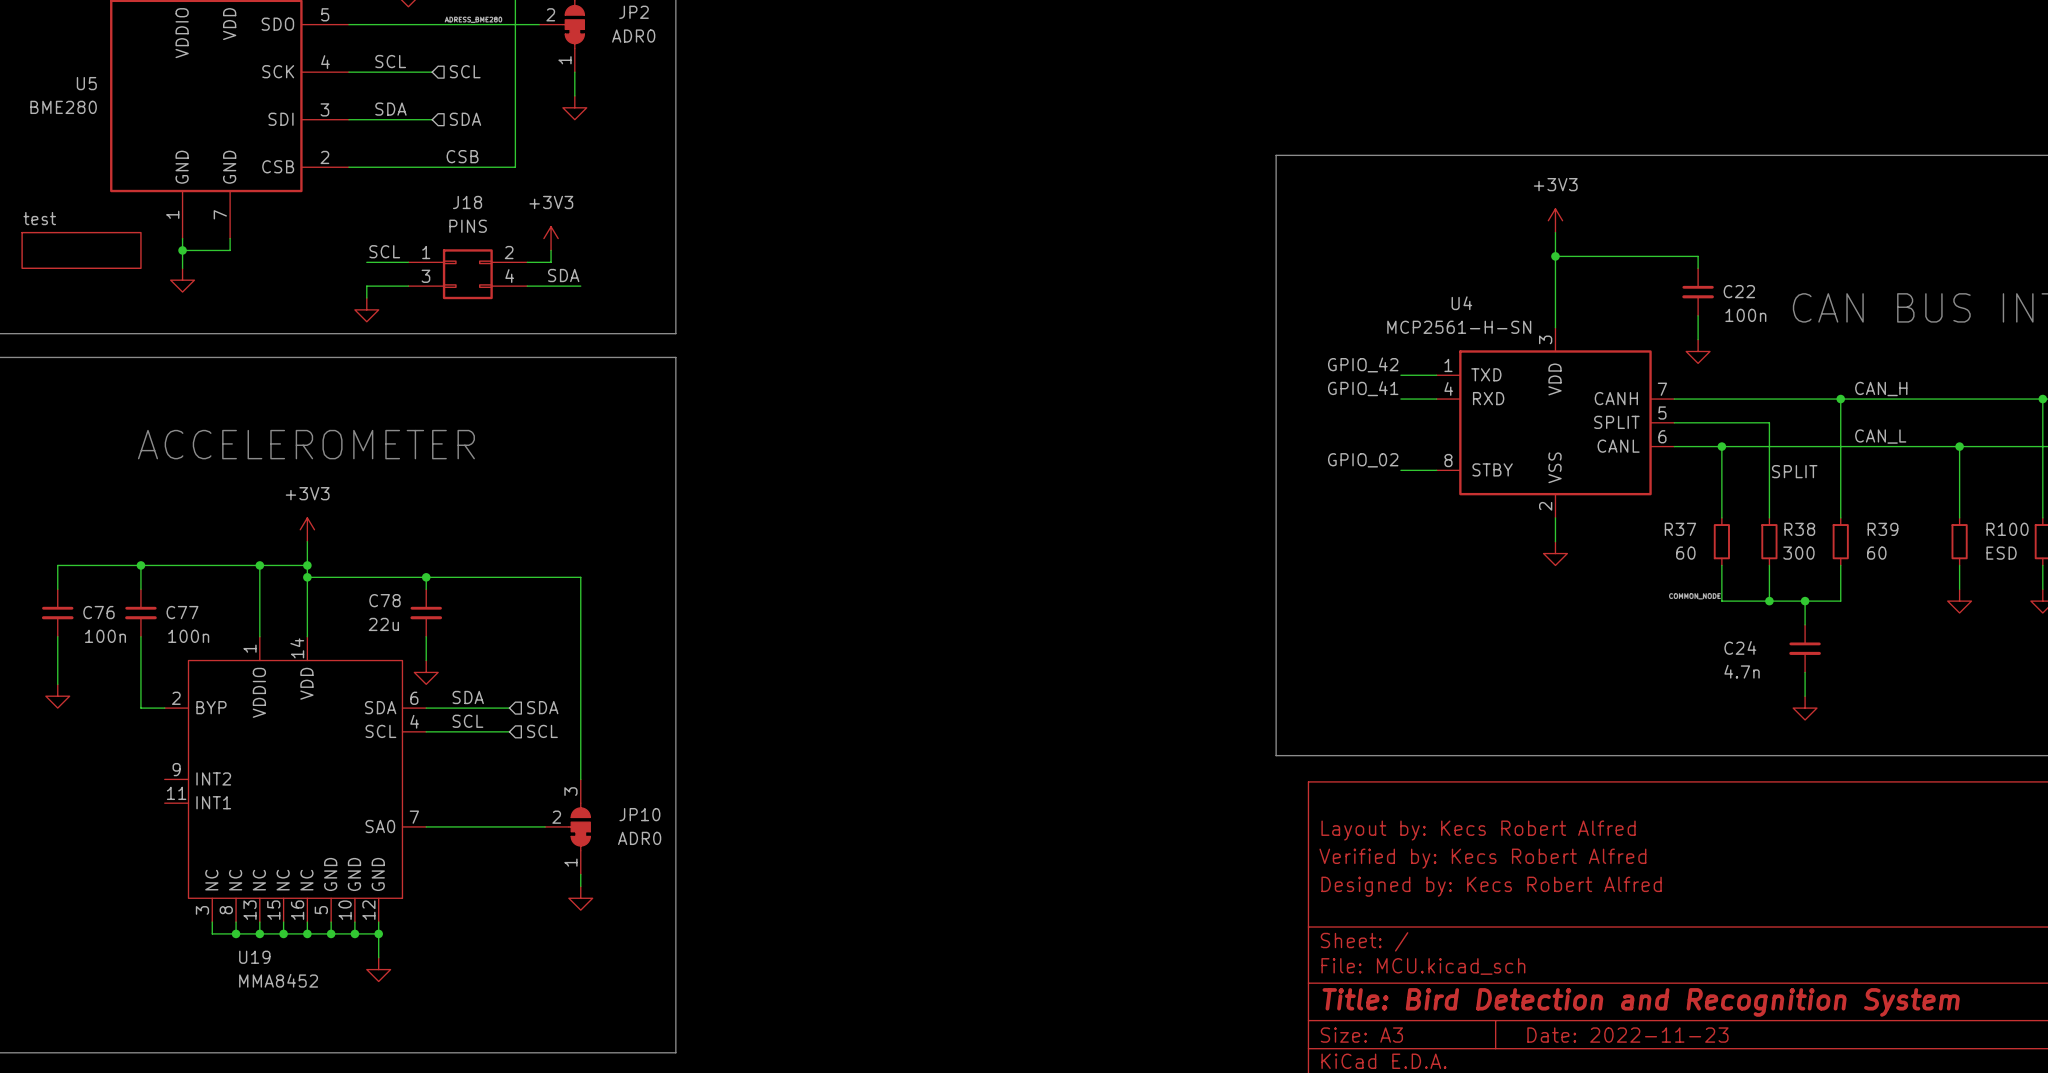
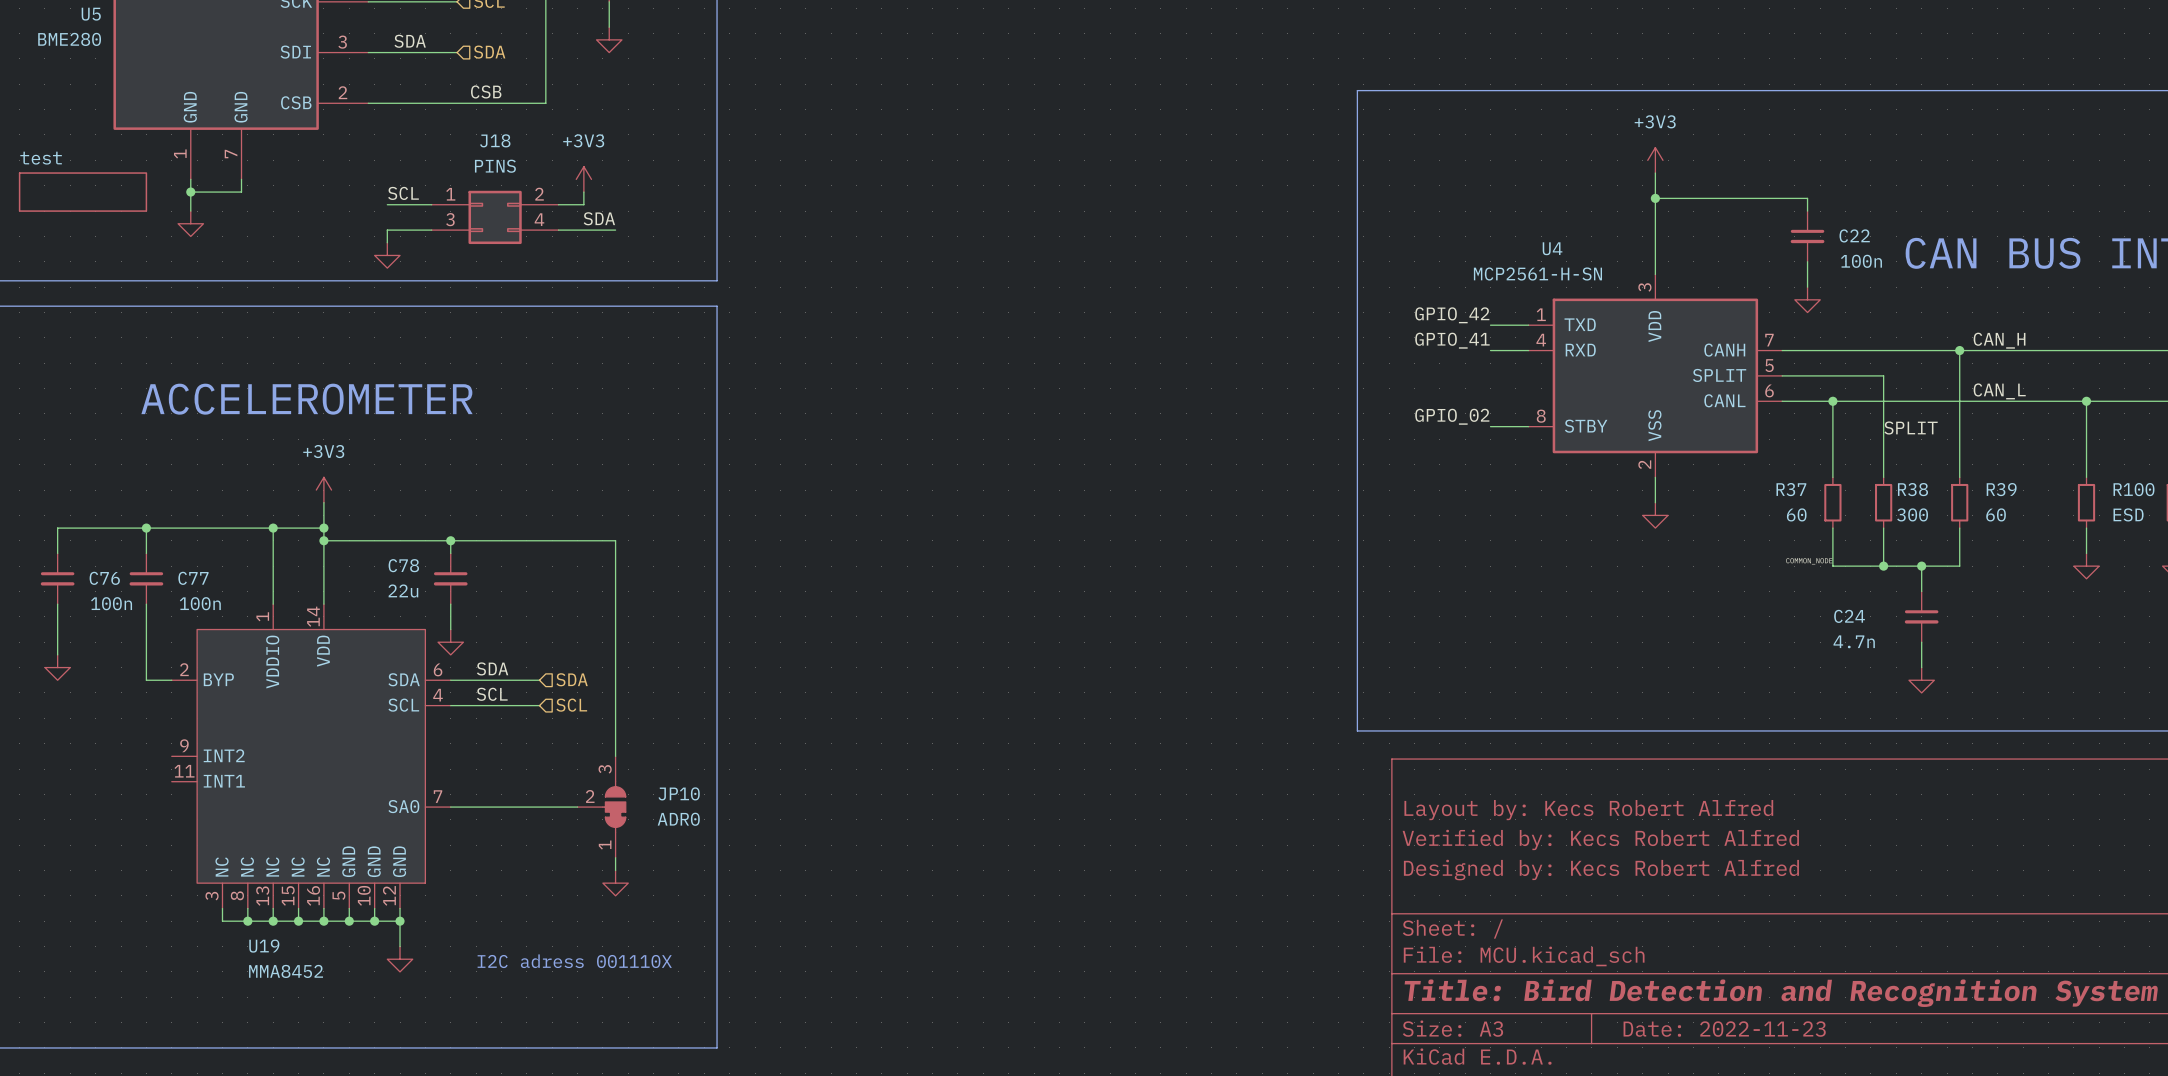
text: none -> I2C adress 001110X (574, 961)

